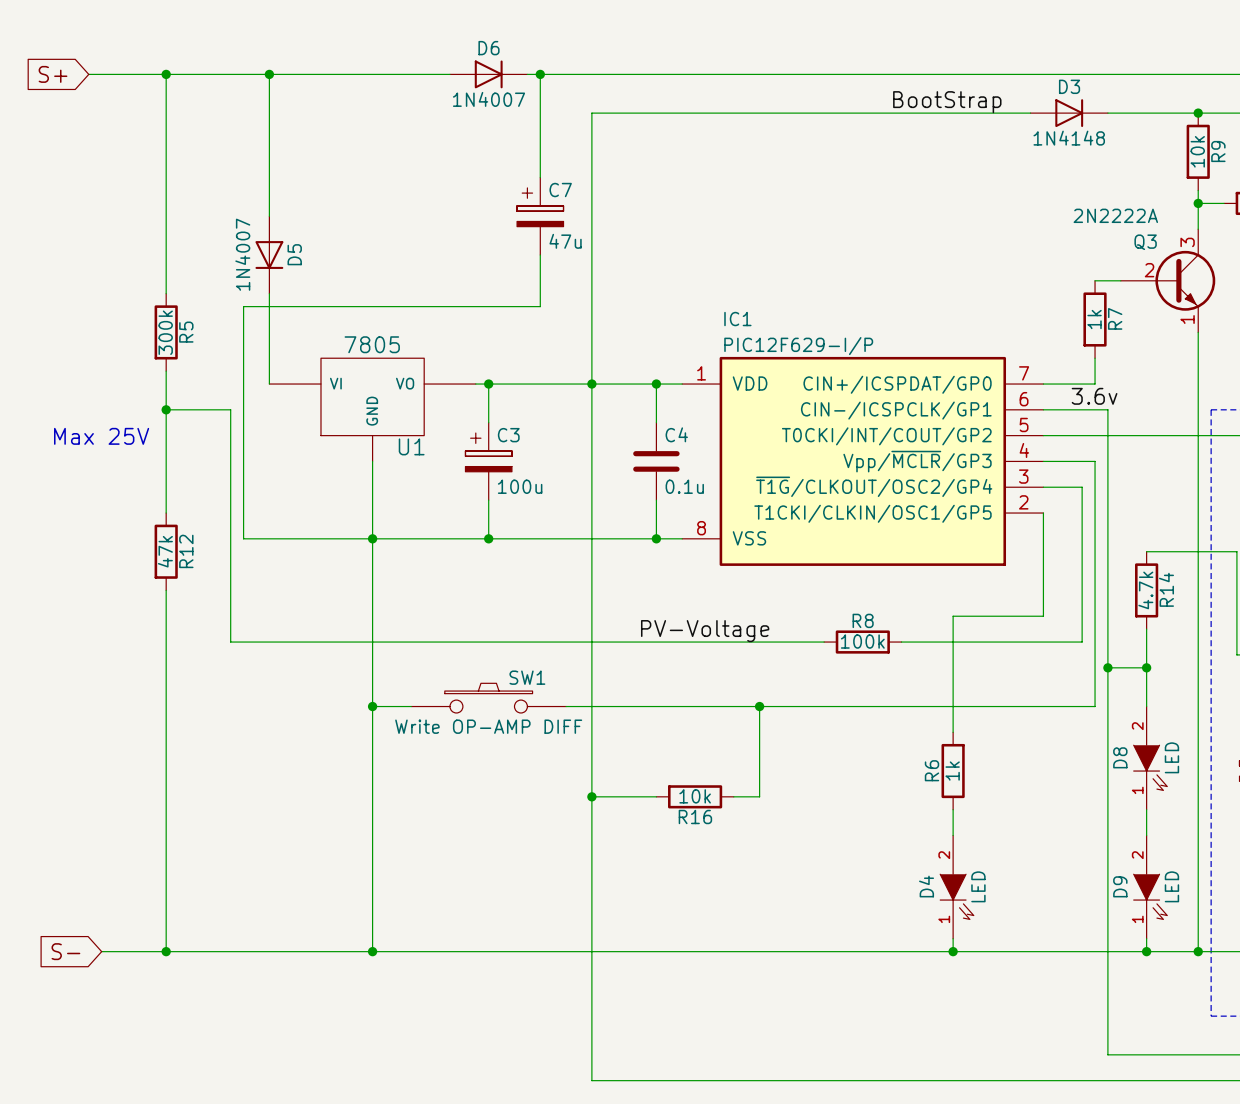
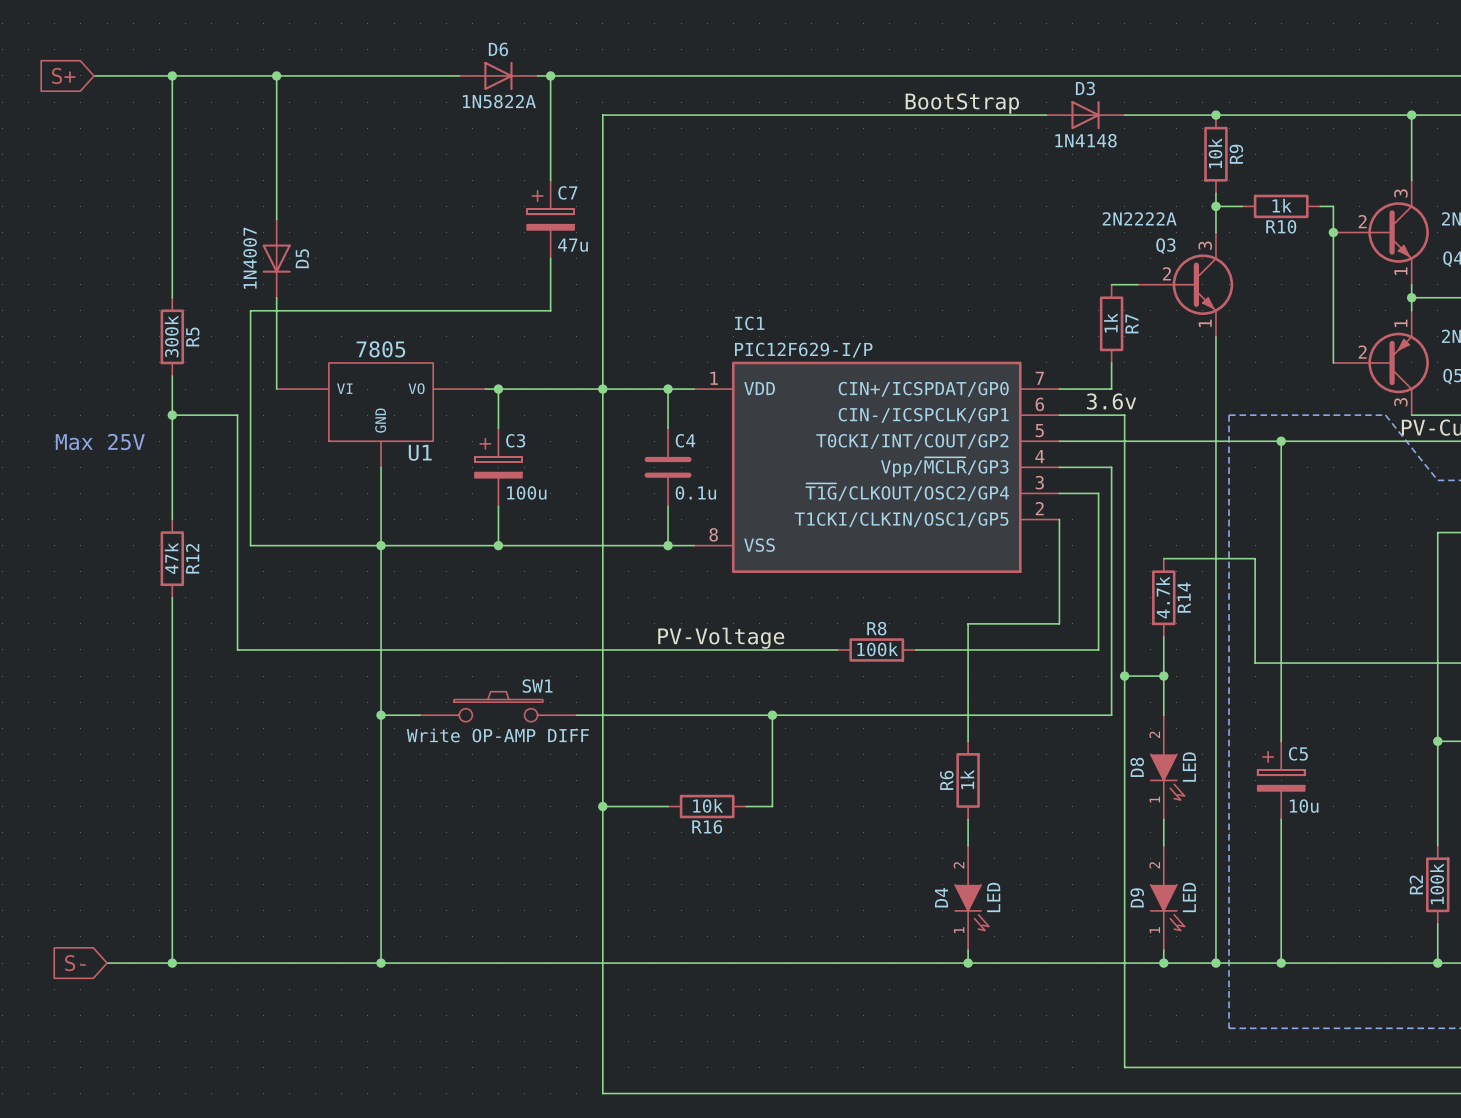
D6 value: 1N4007 (489, 99) -> 1N5822A (499, 101)

